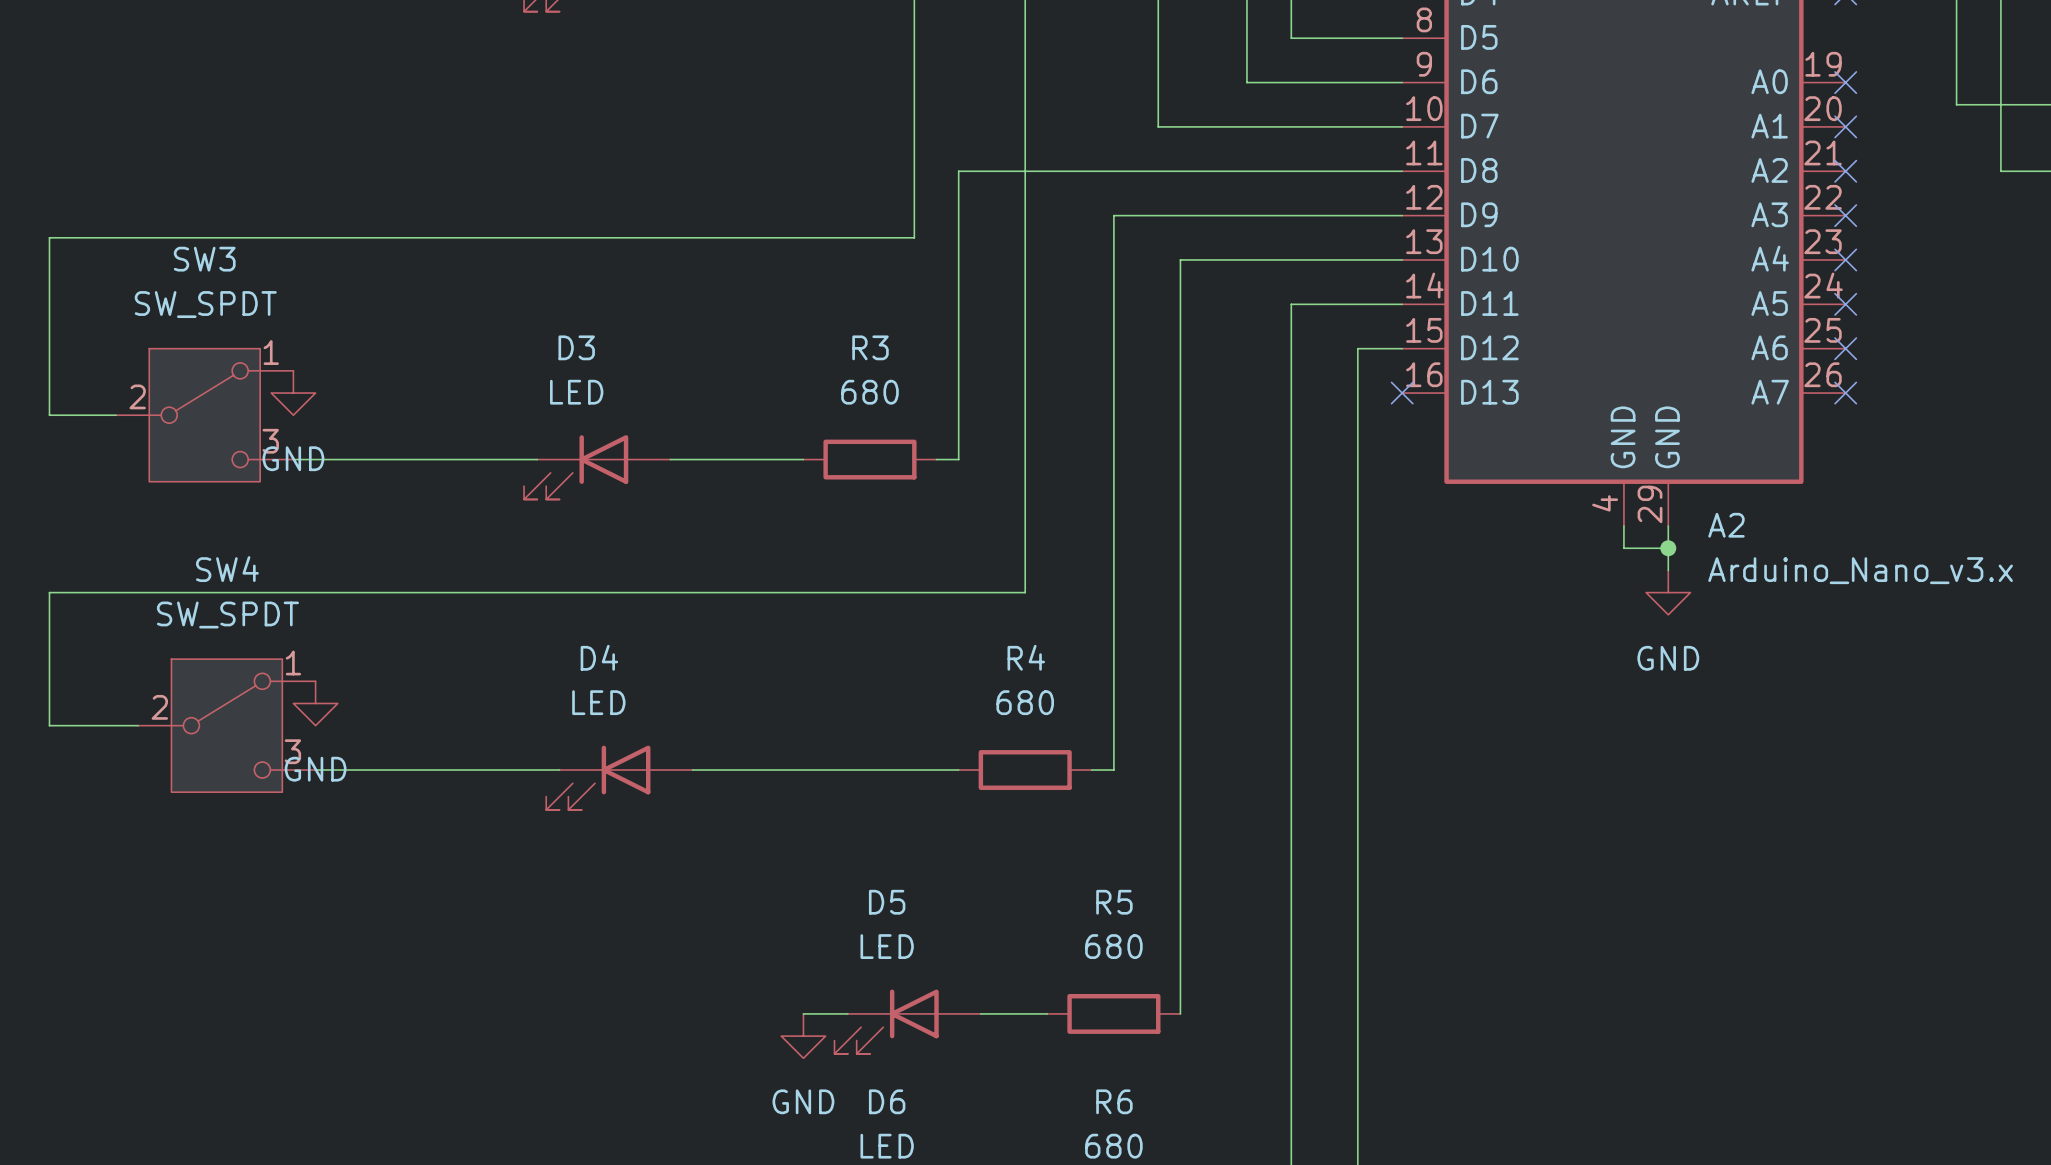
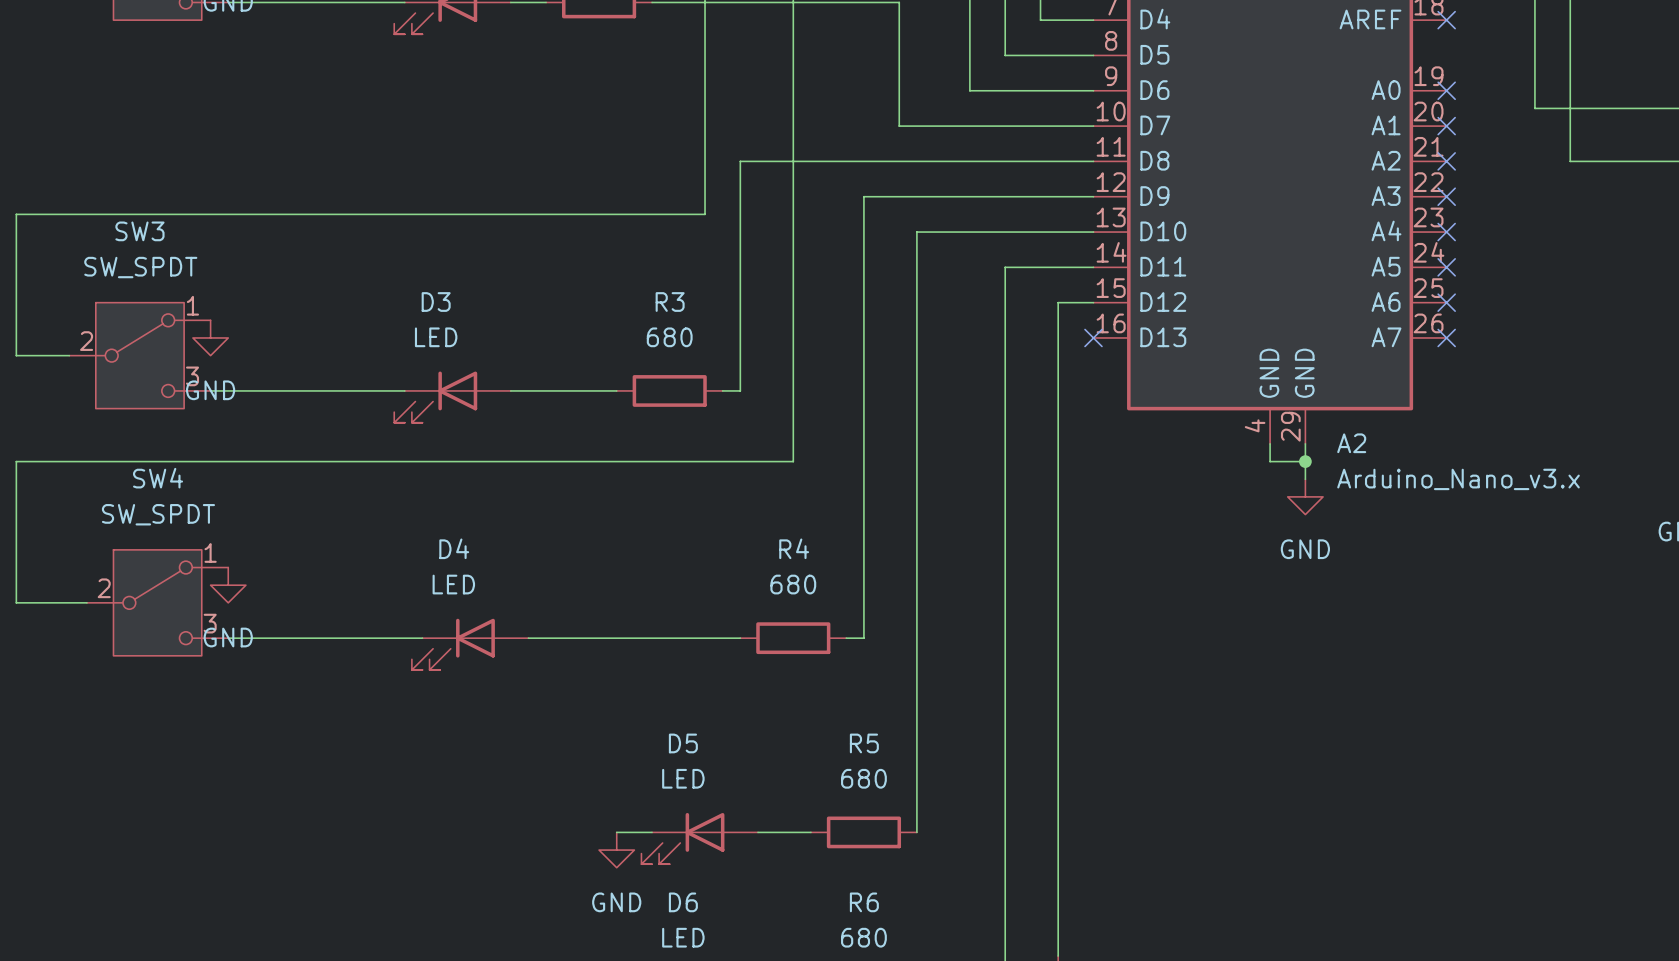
wire: (1025, 548) (1025, 592) (49, 592) -> (793, 461) (16, 461) (16, 496)

